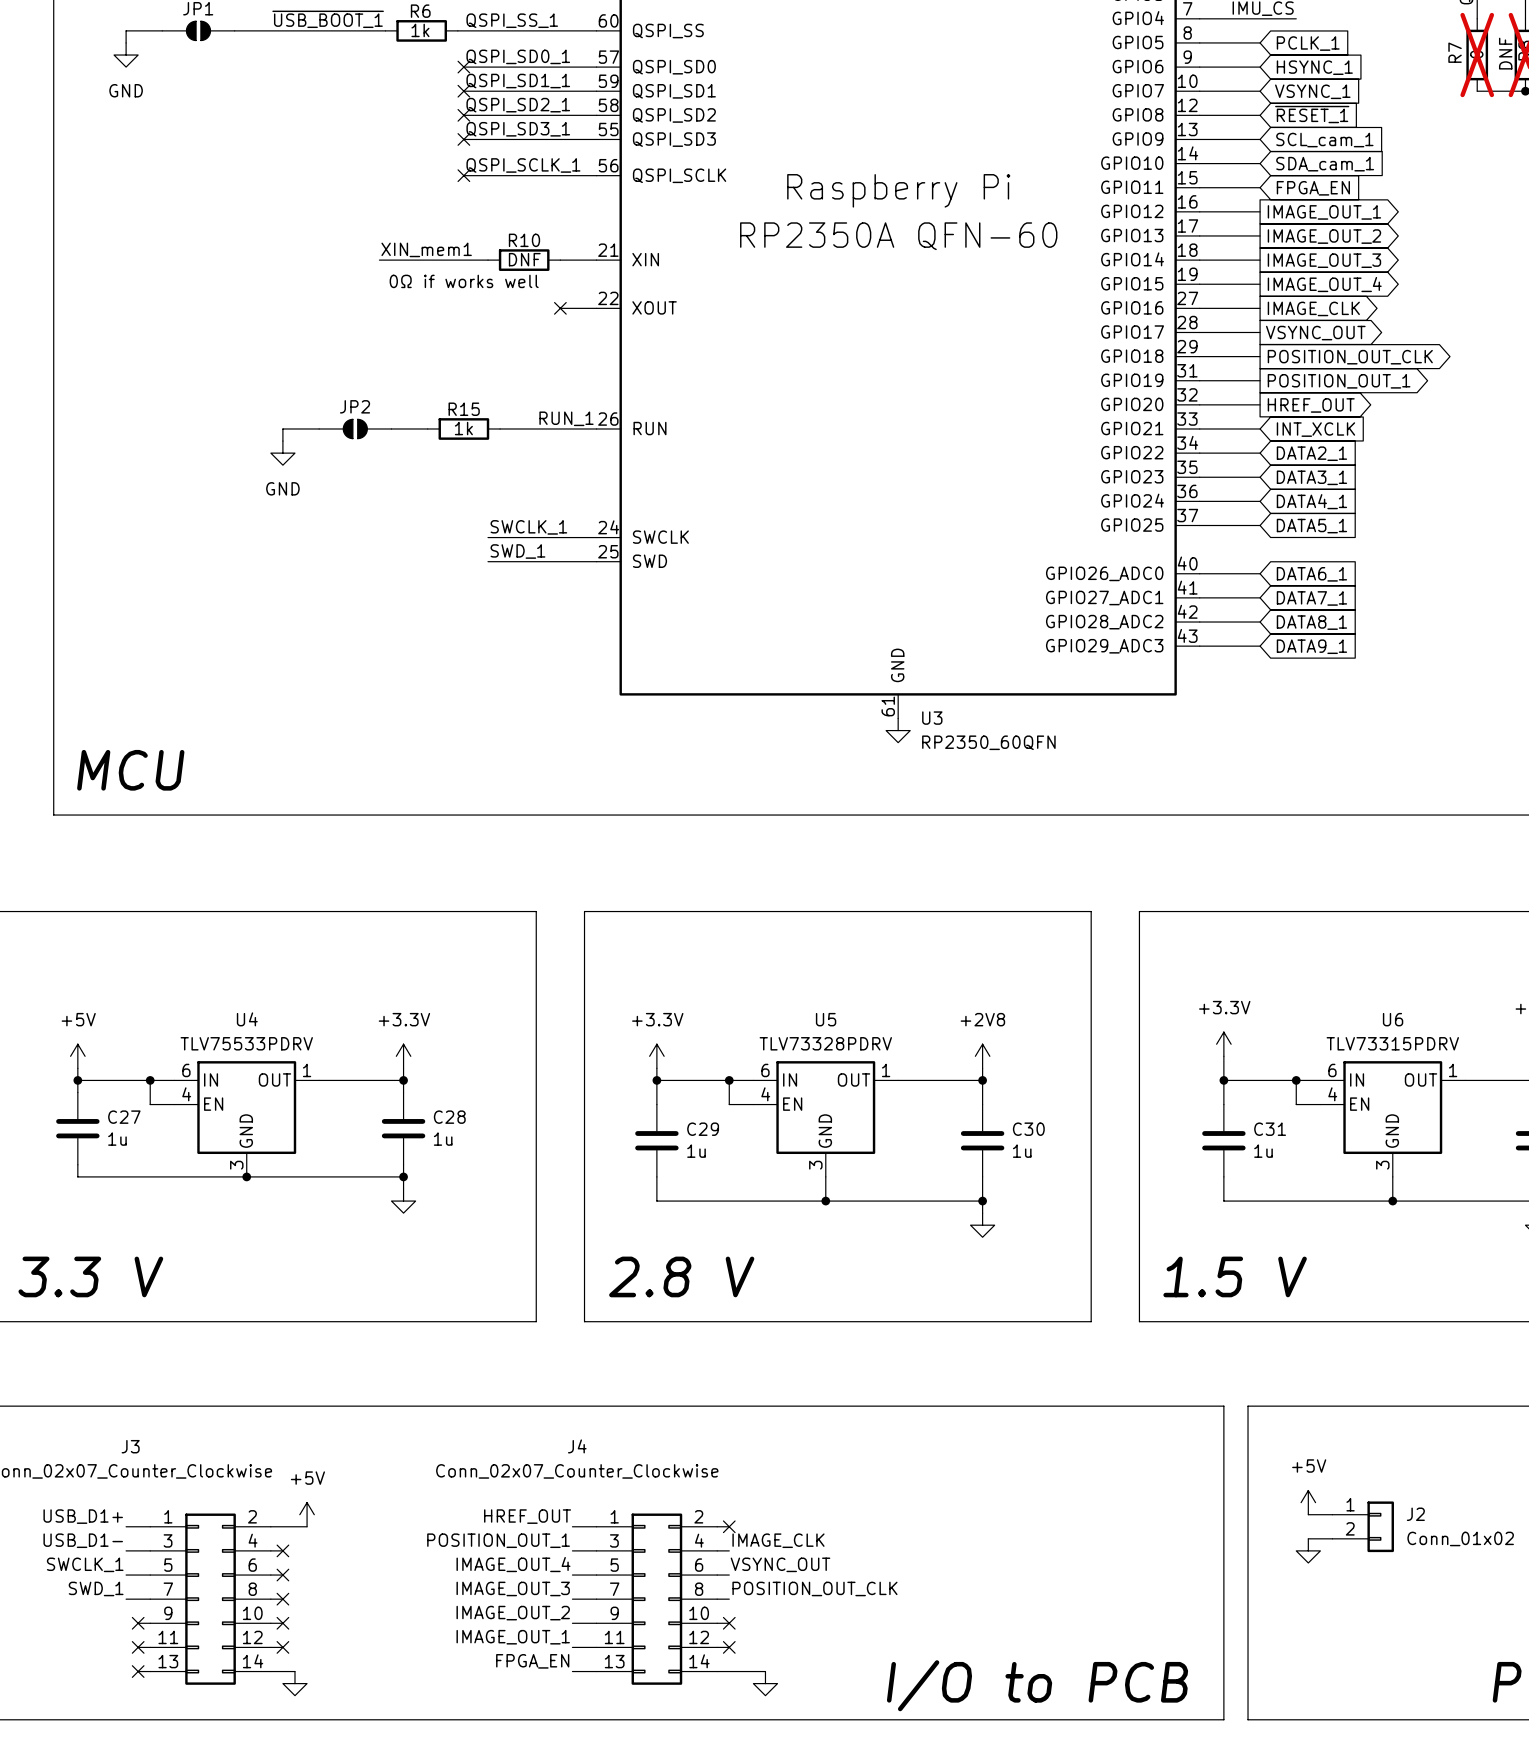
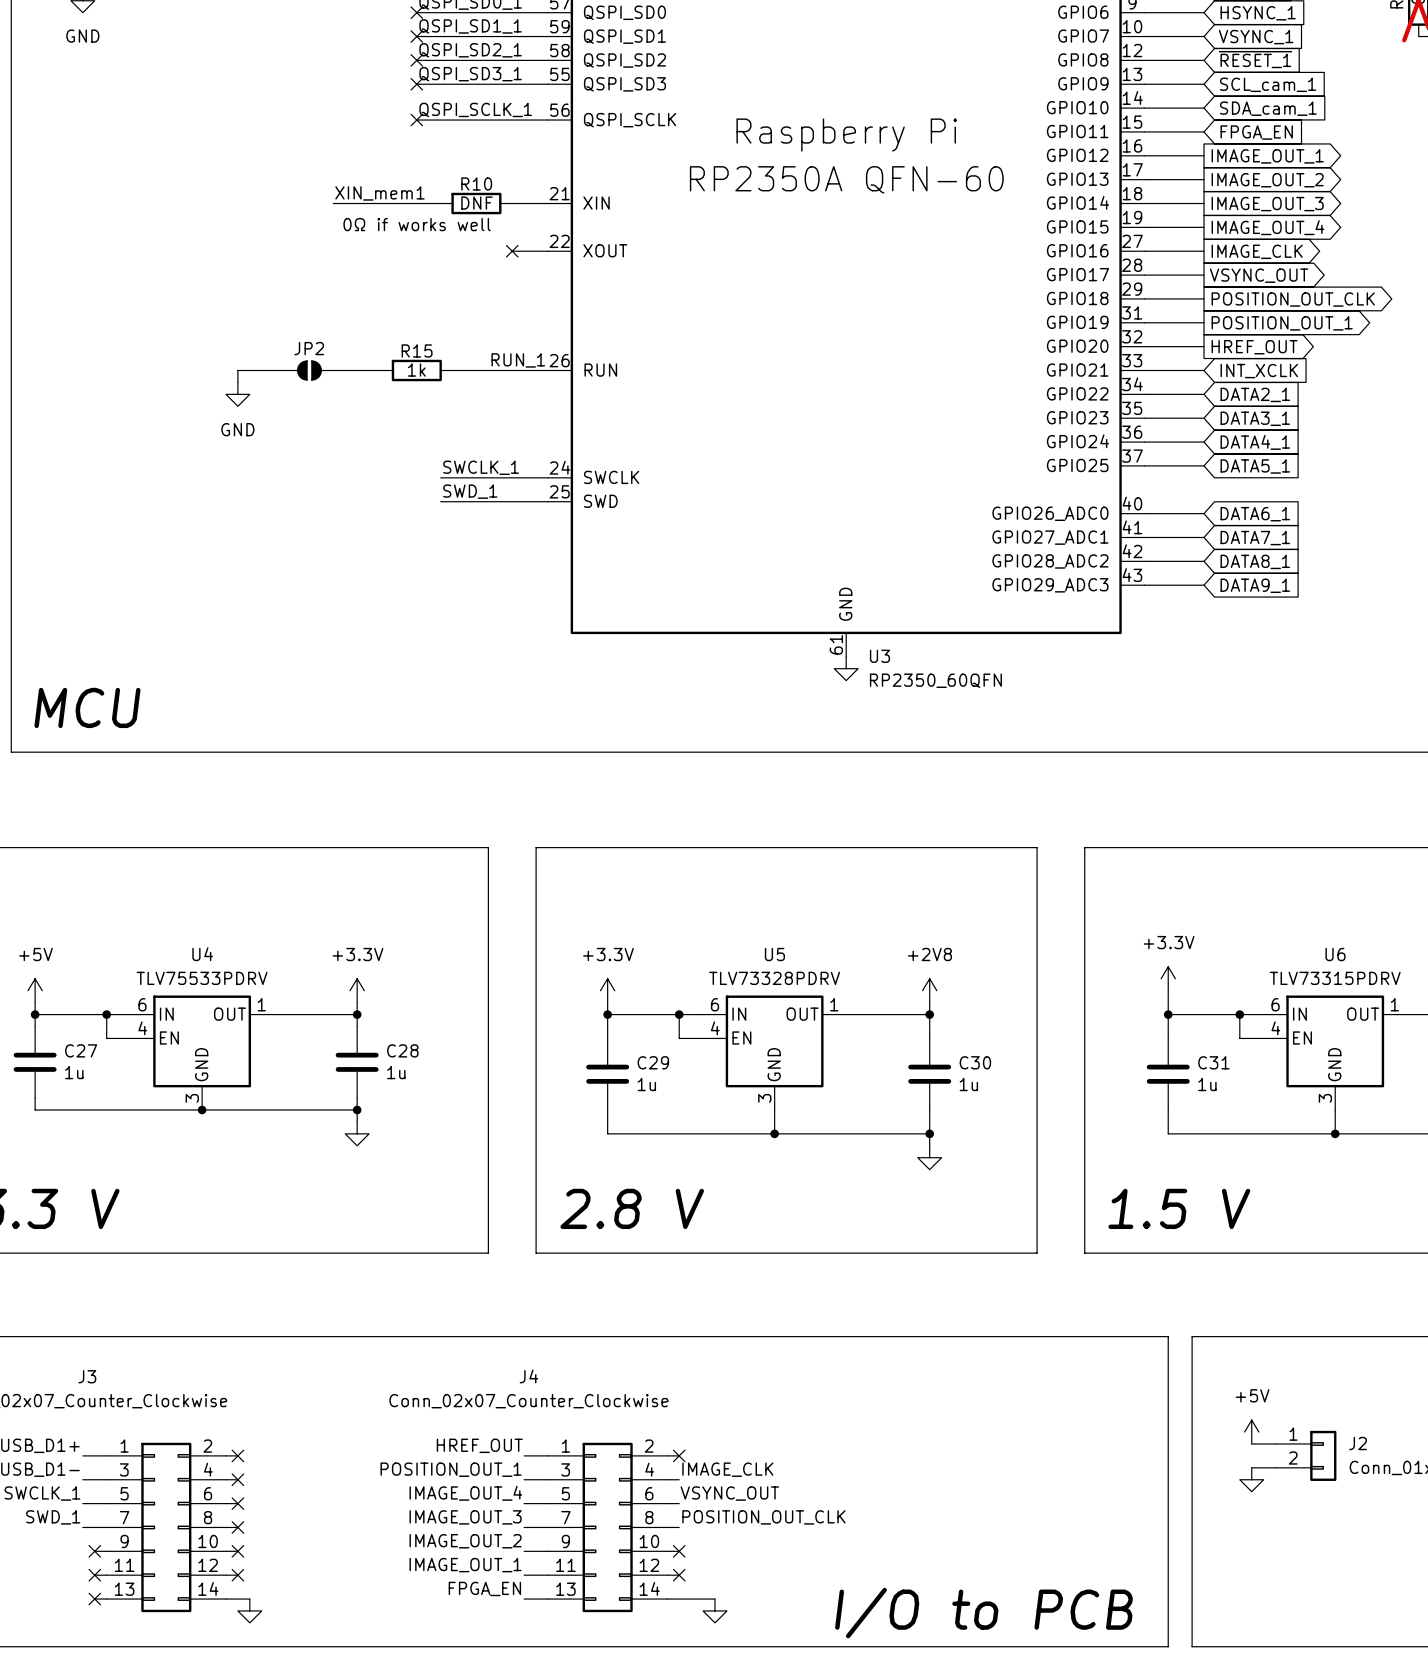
power symbol: +5V (307, 1514) -> none
wire: (282, 1526) (307, 1526) -> none
no-connect mark: none -> (237, 1455)

